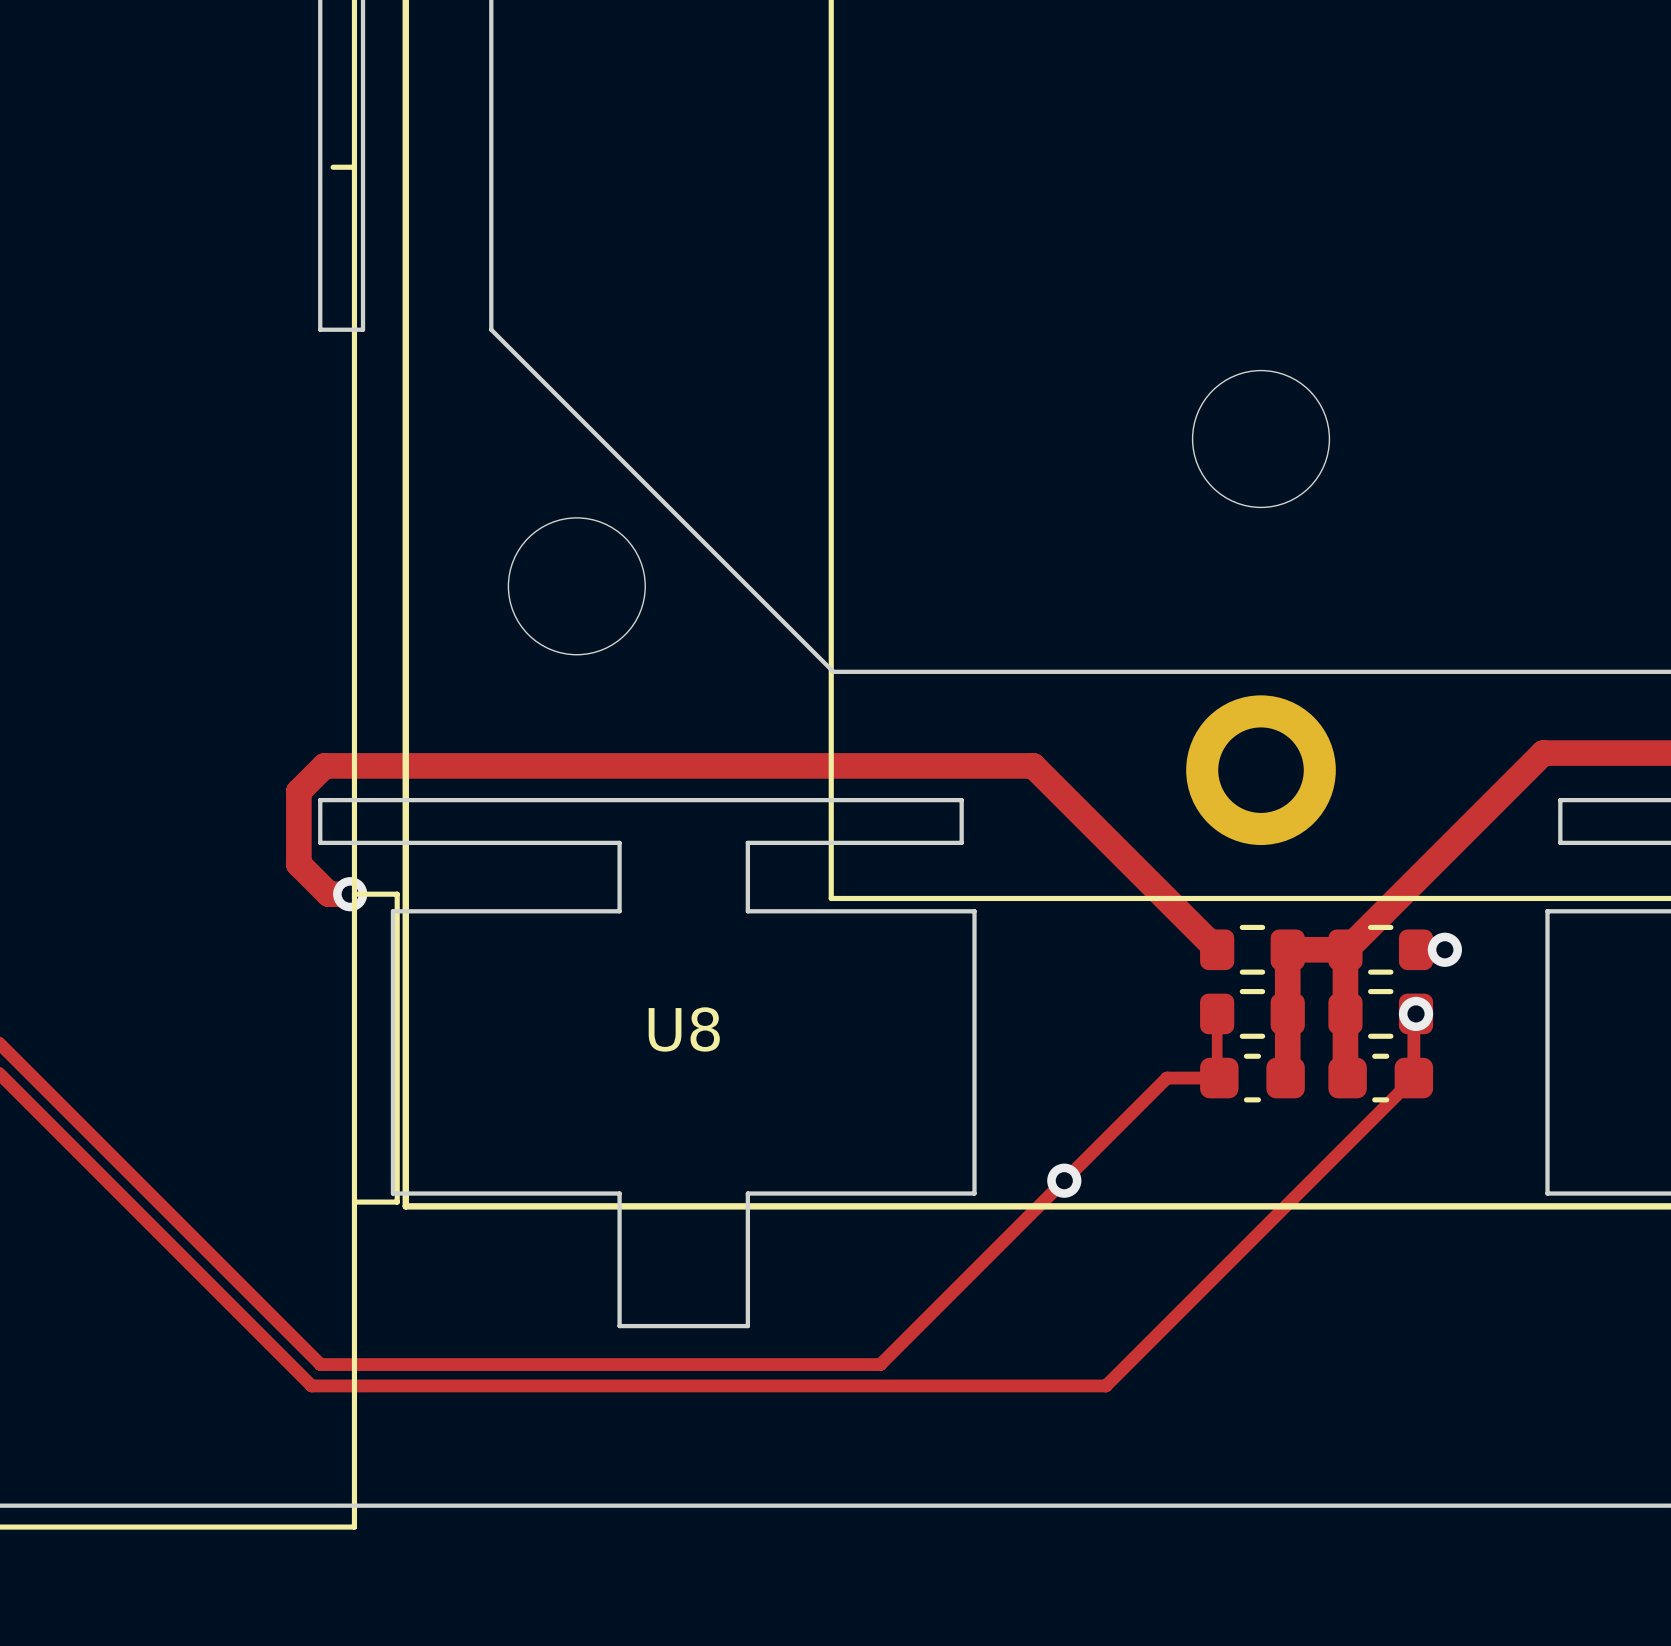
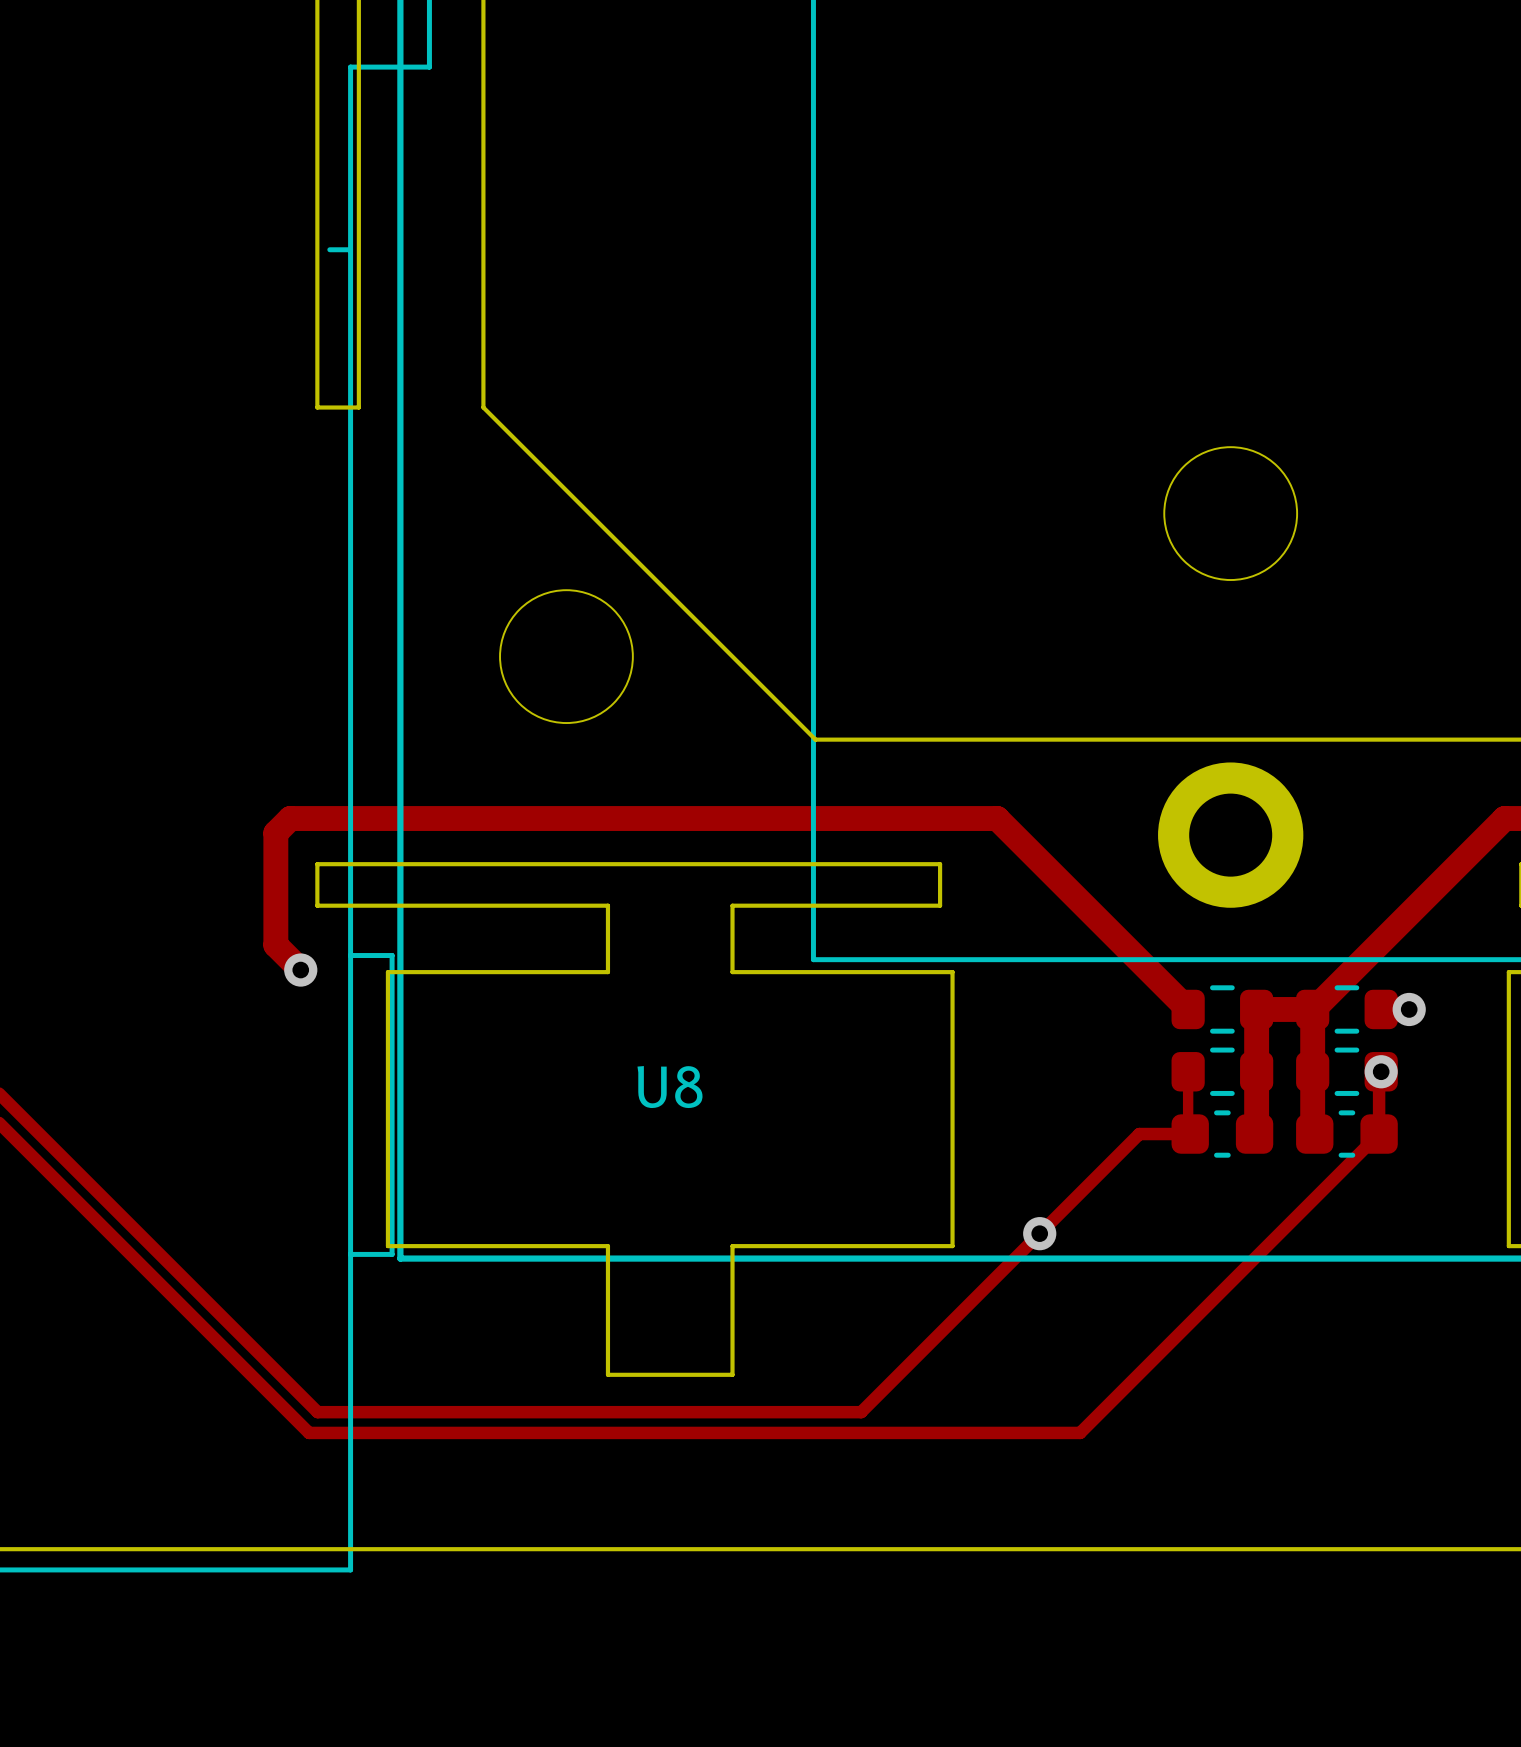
track: (1033, 765) (324, 765) (298, 791) (298, 864) (328, 894) (350, 894) -> (1009, 830) (997, 818) (290, 818) (275, 833) (275, 945) (300, 970)
via position: (350, 894) -> (300, 970)

